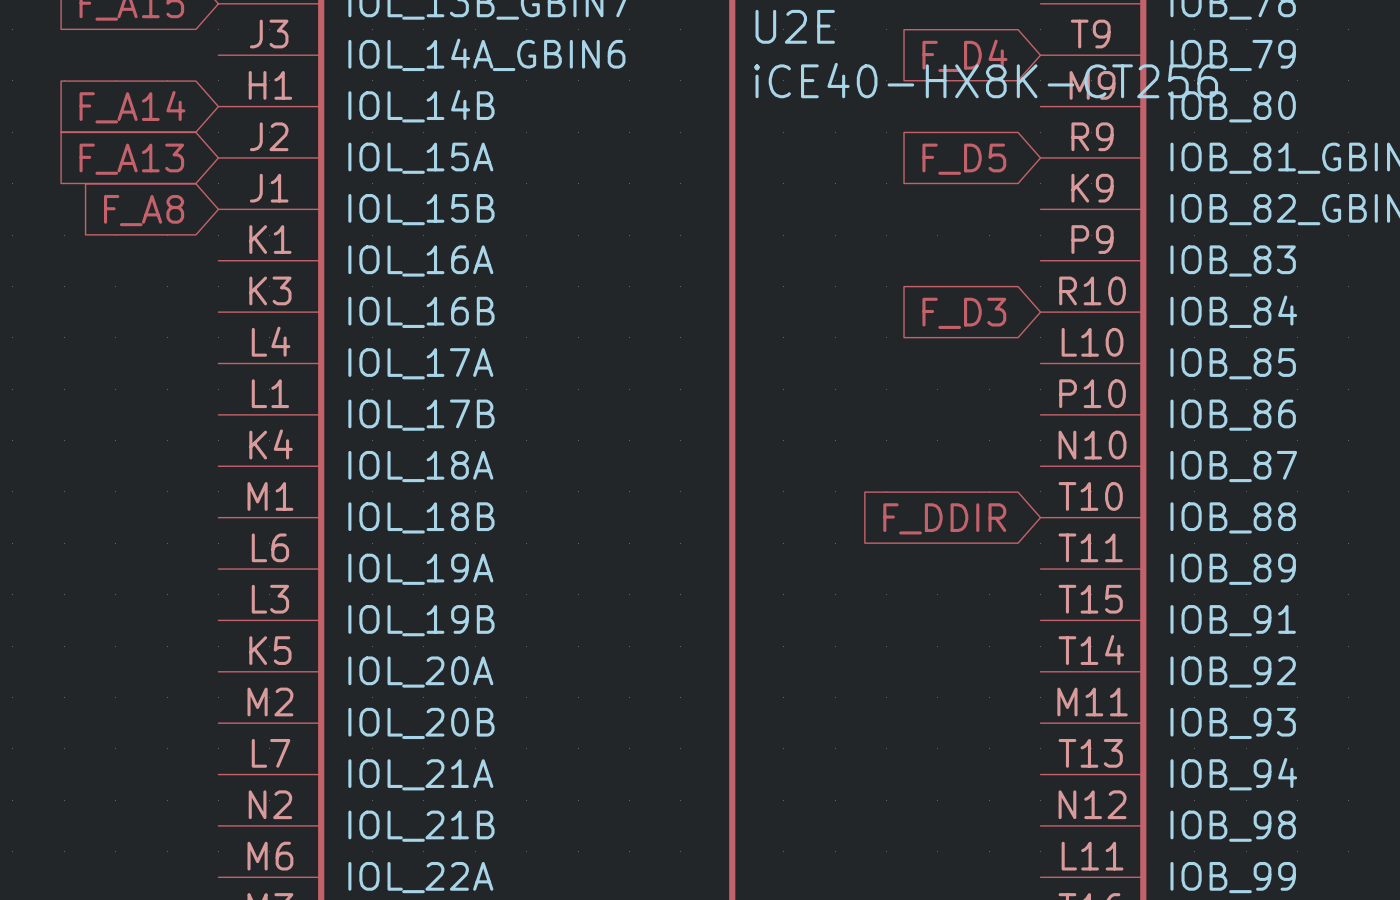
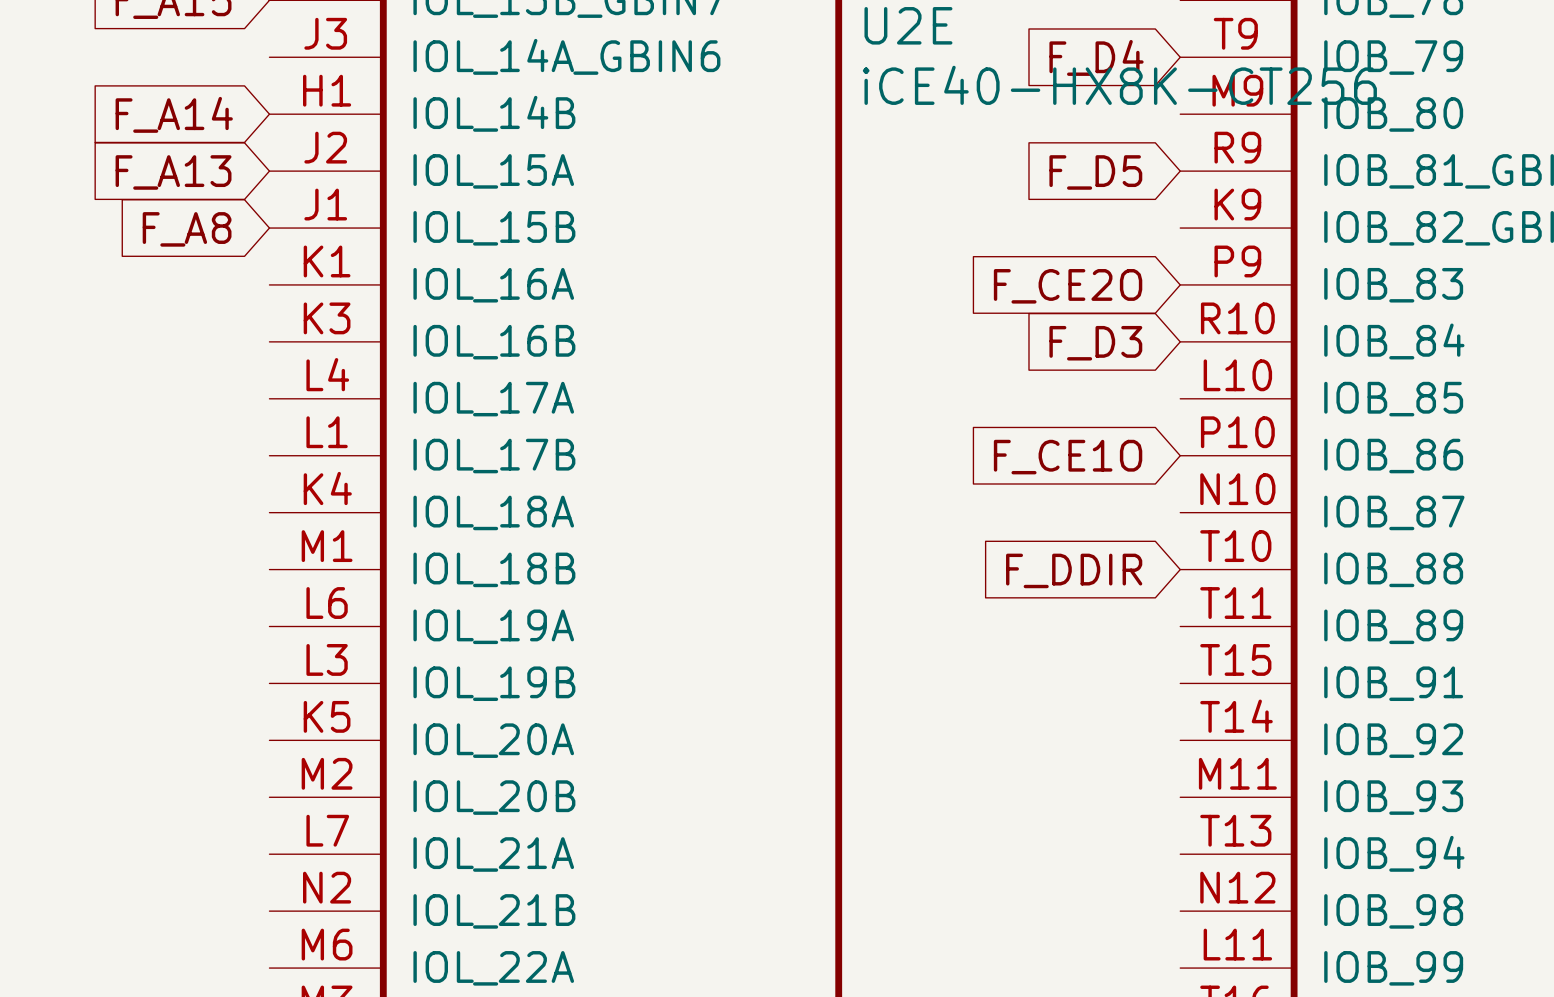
global label: none -> F_CE2O (1068, 286)
global label: none -> F_CE1O (1068, 457)

